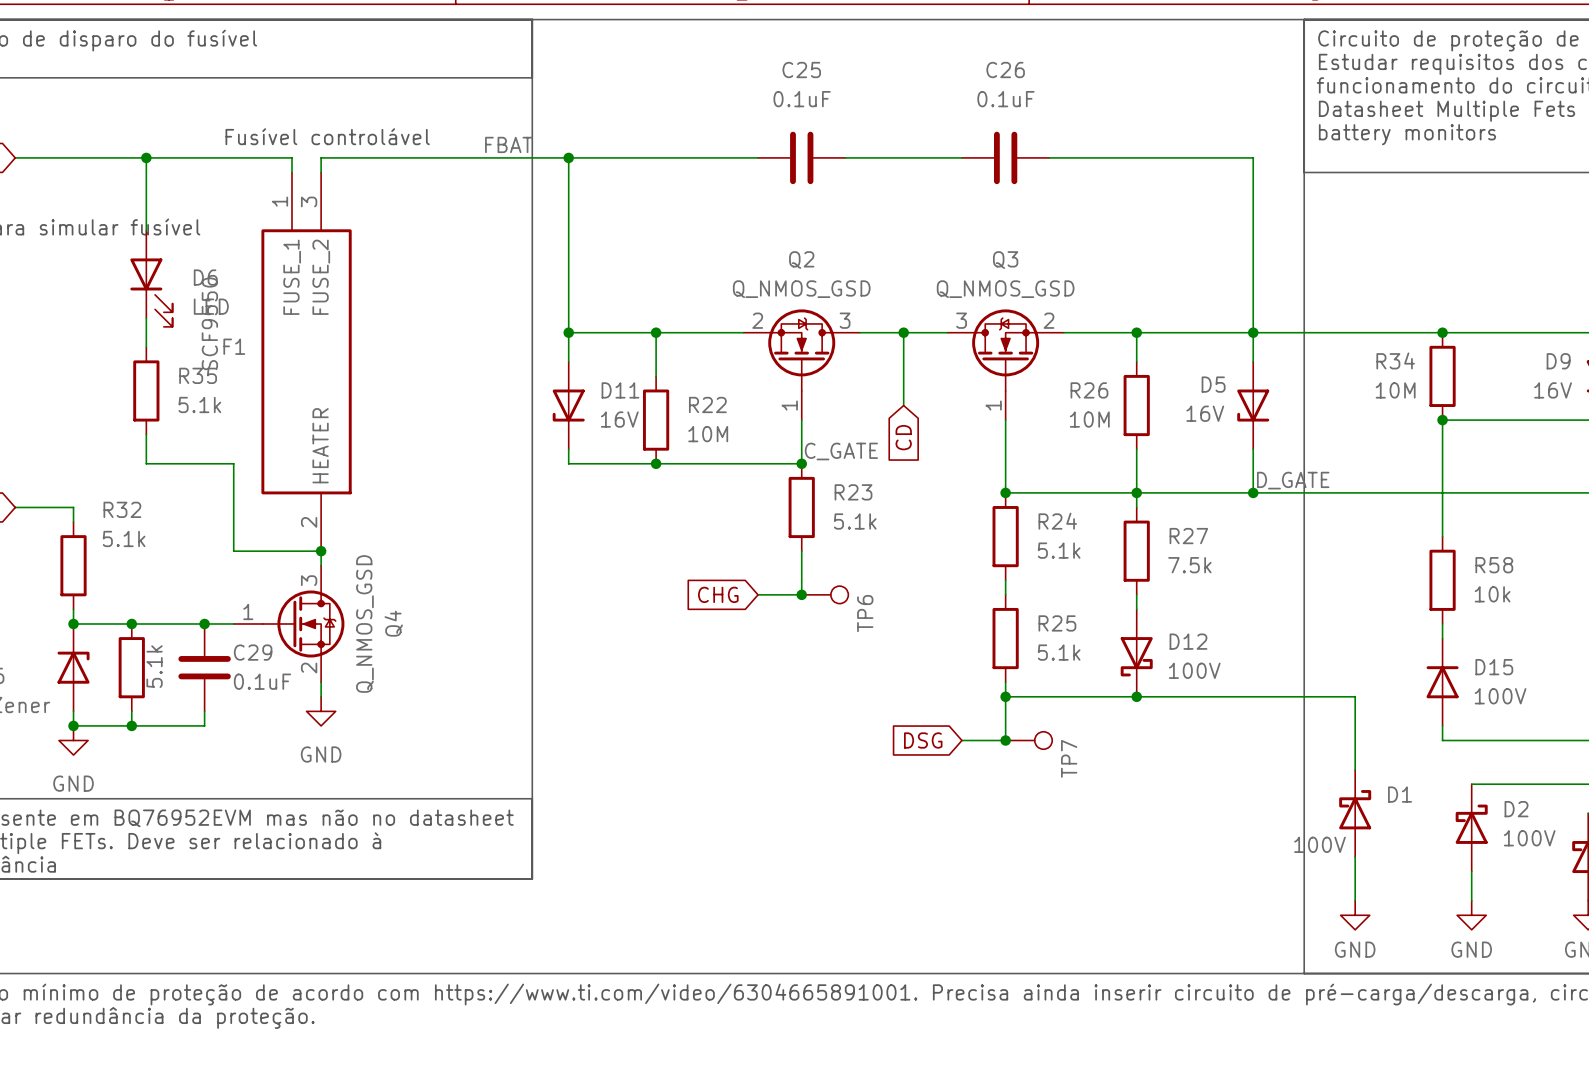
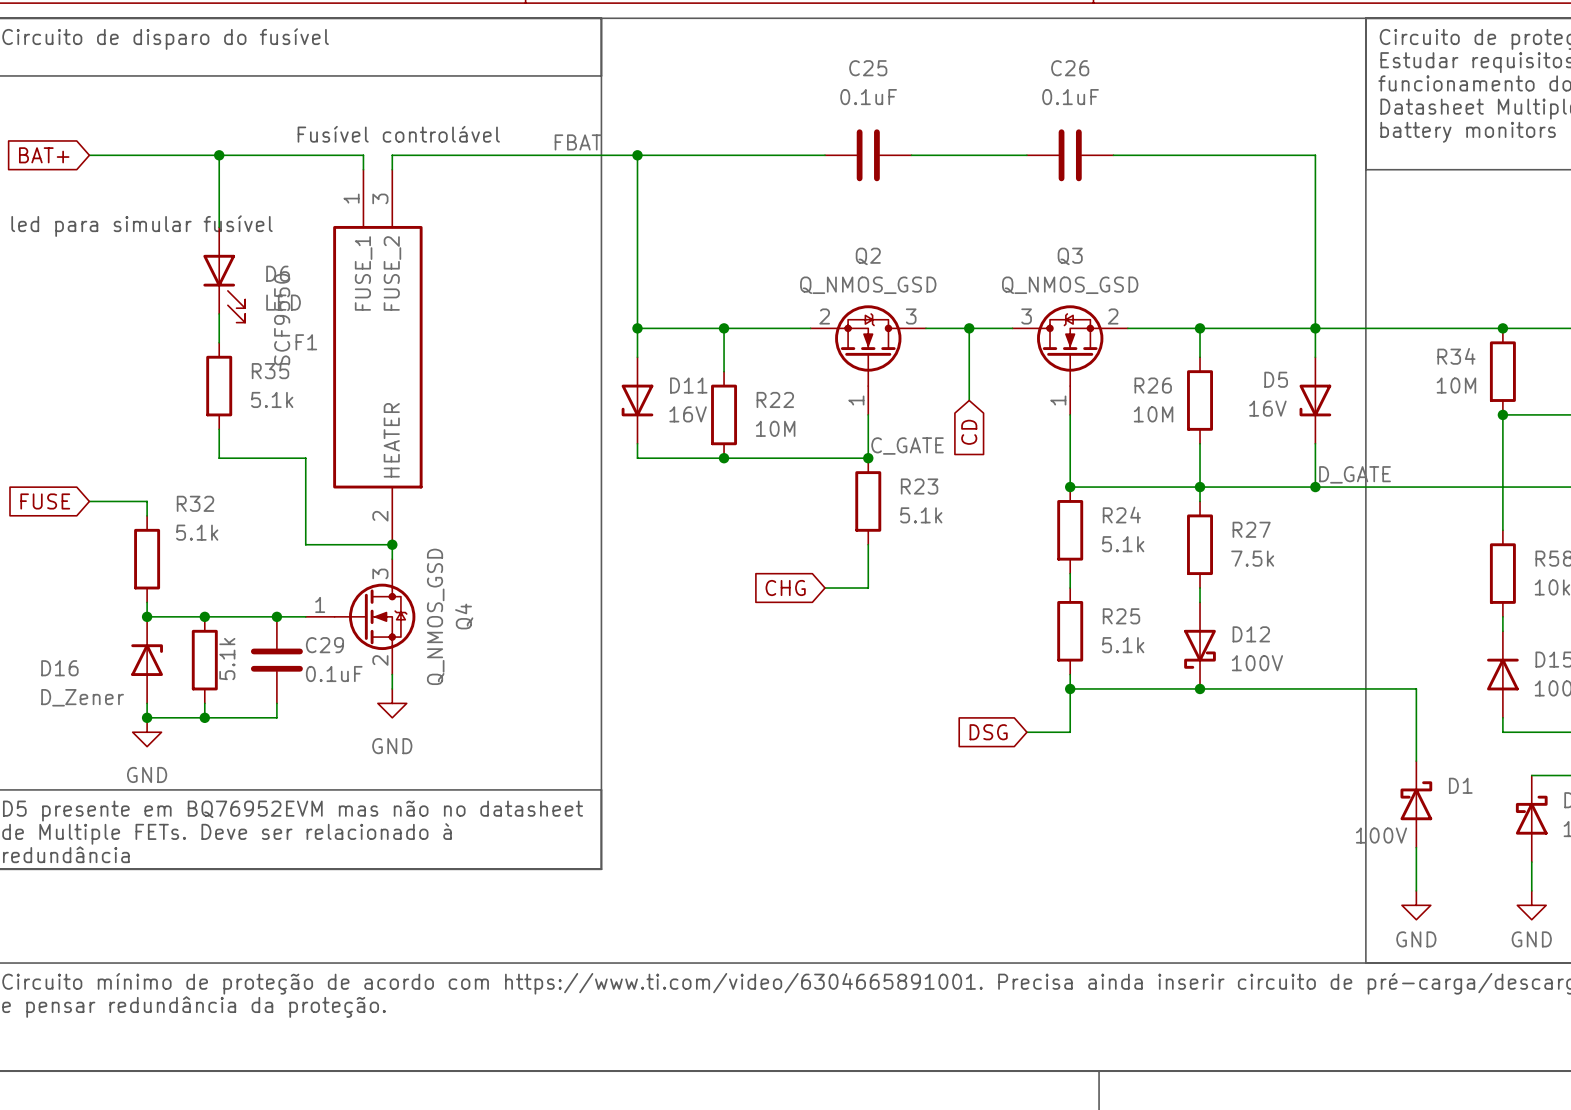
junction: (801, 594) -> none
TP6: (825, 594) -> none
junction: (1005, 740) -> none
TP7: (1028, 740) -> none

